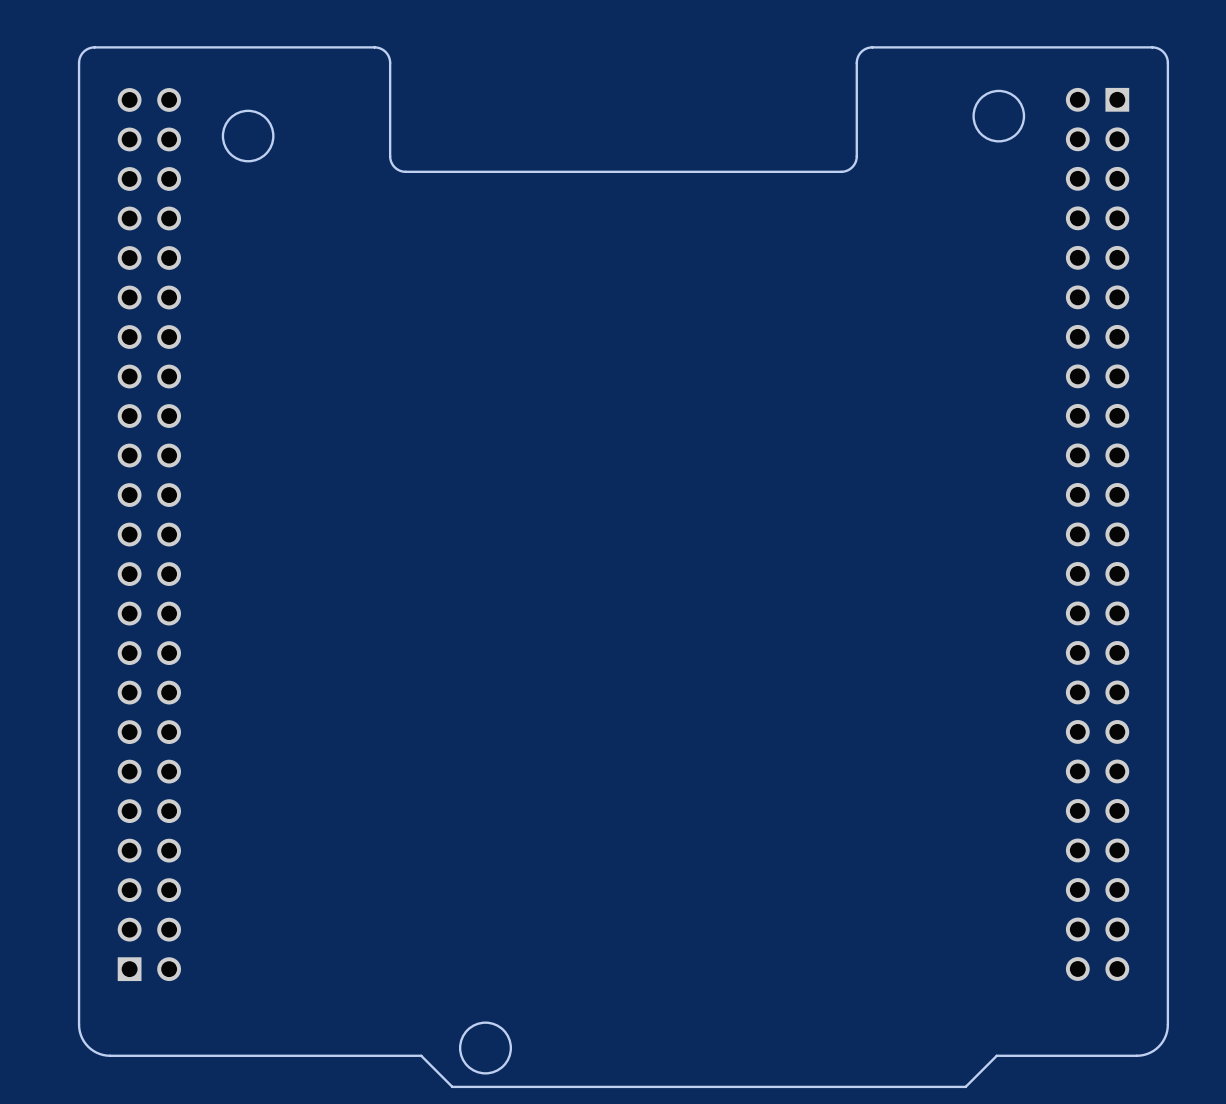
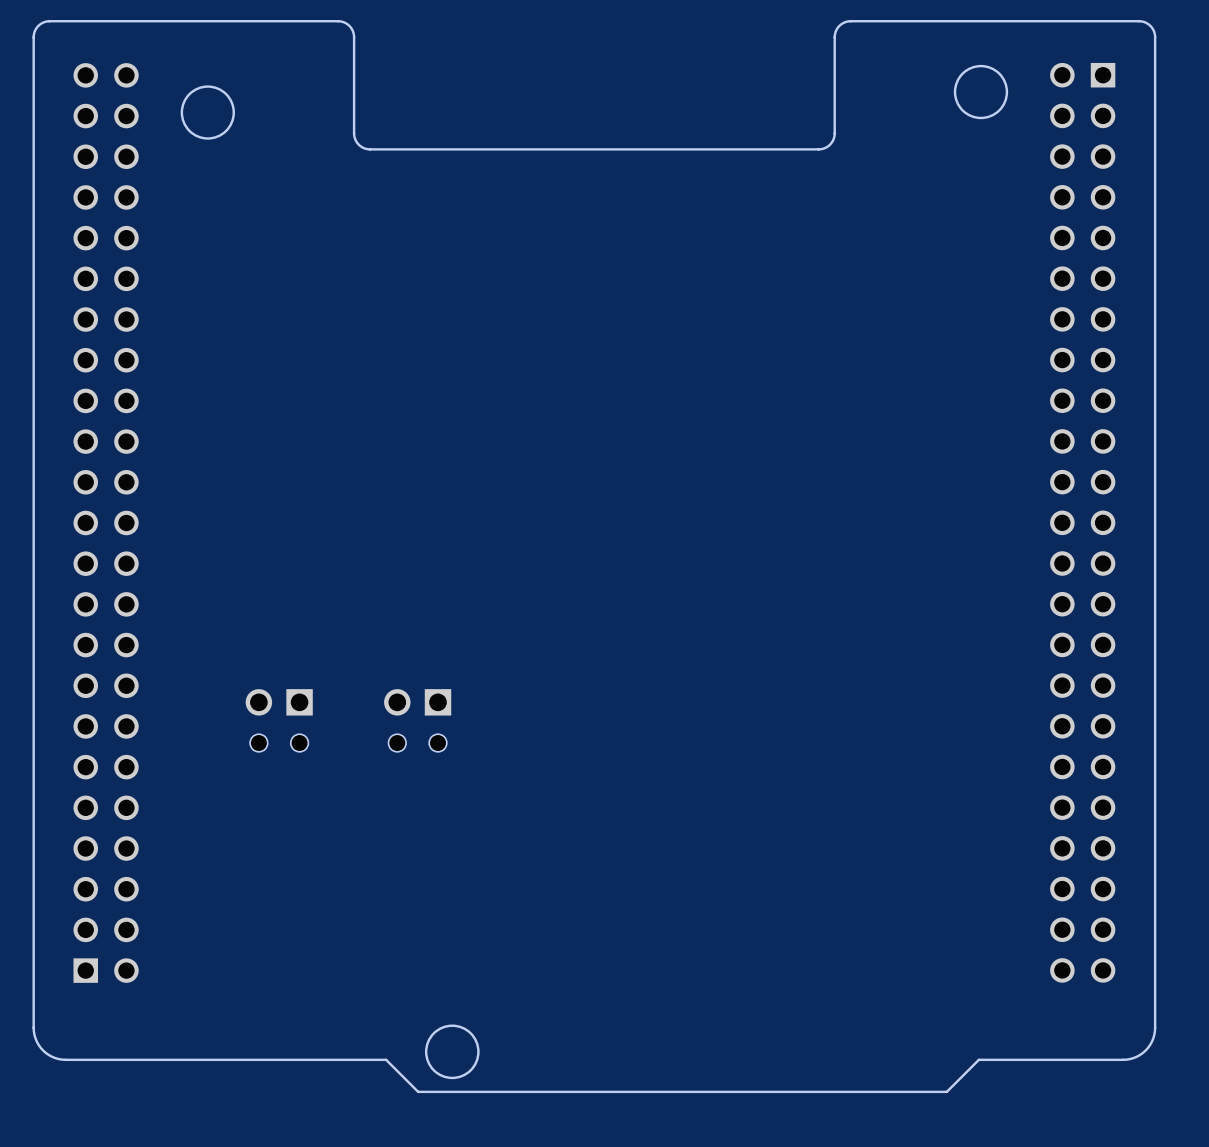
part: none -> (279, 720)
part: none -> (417, 720)

